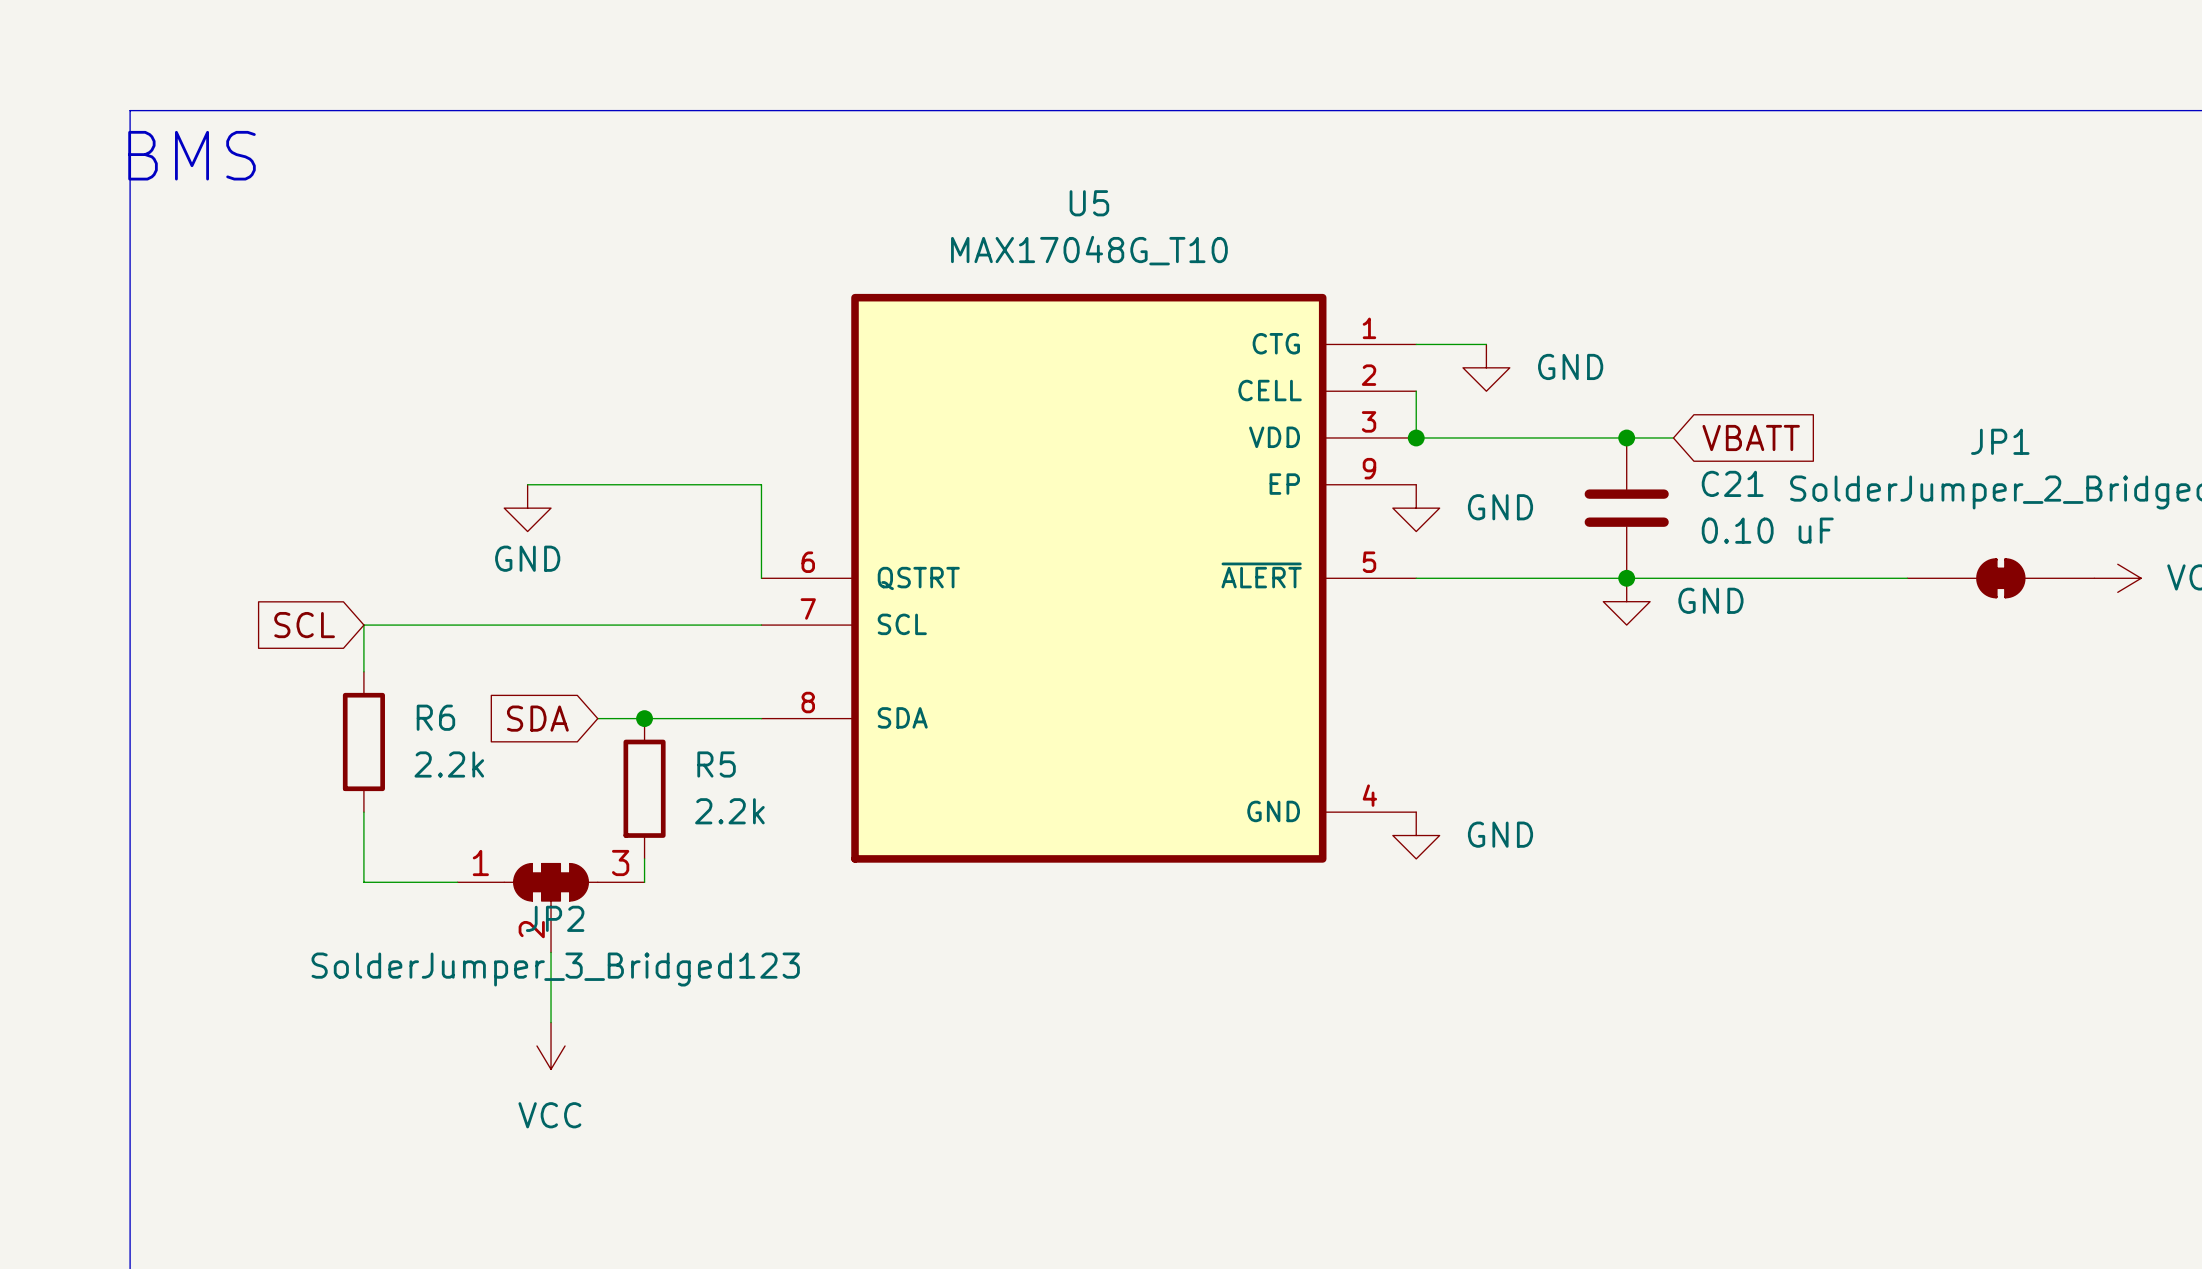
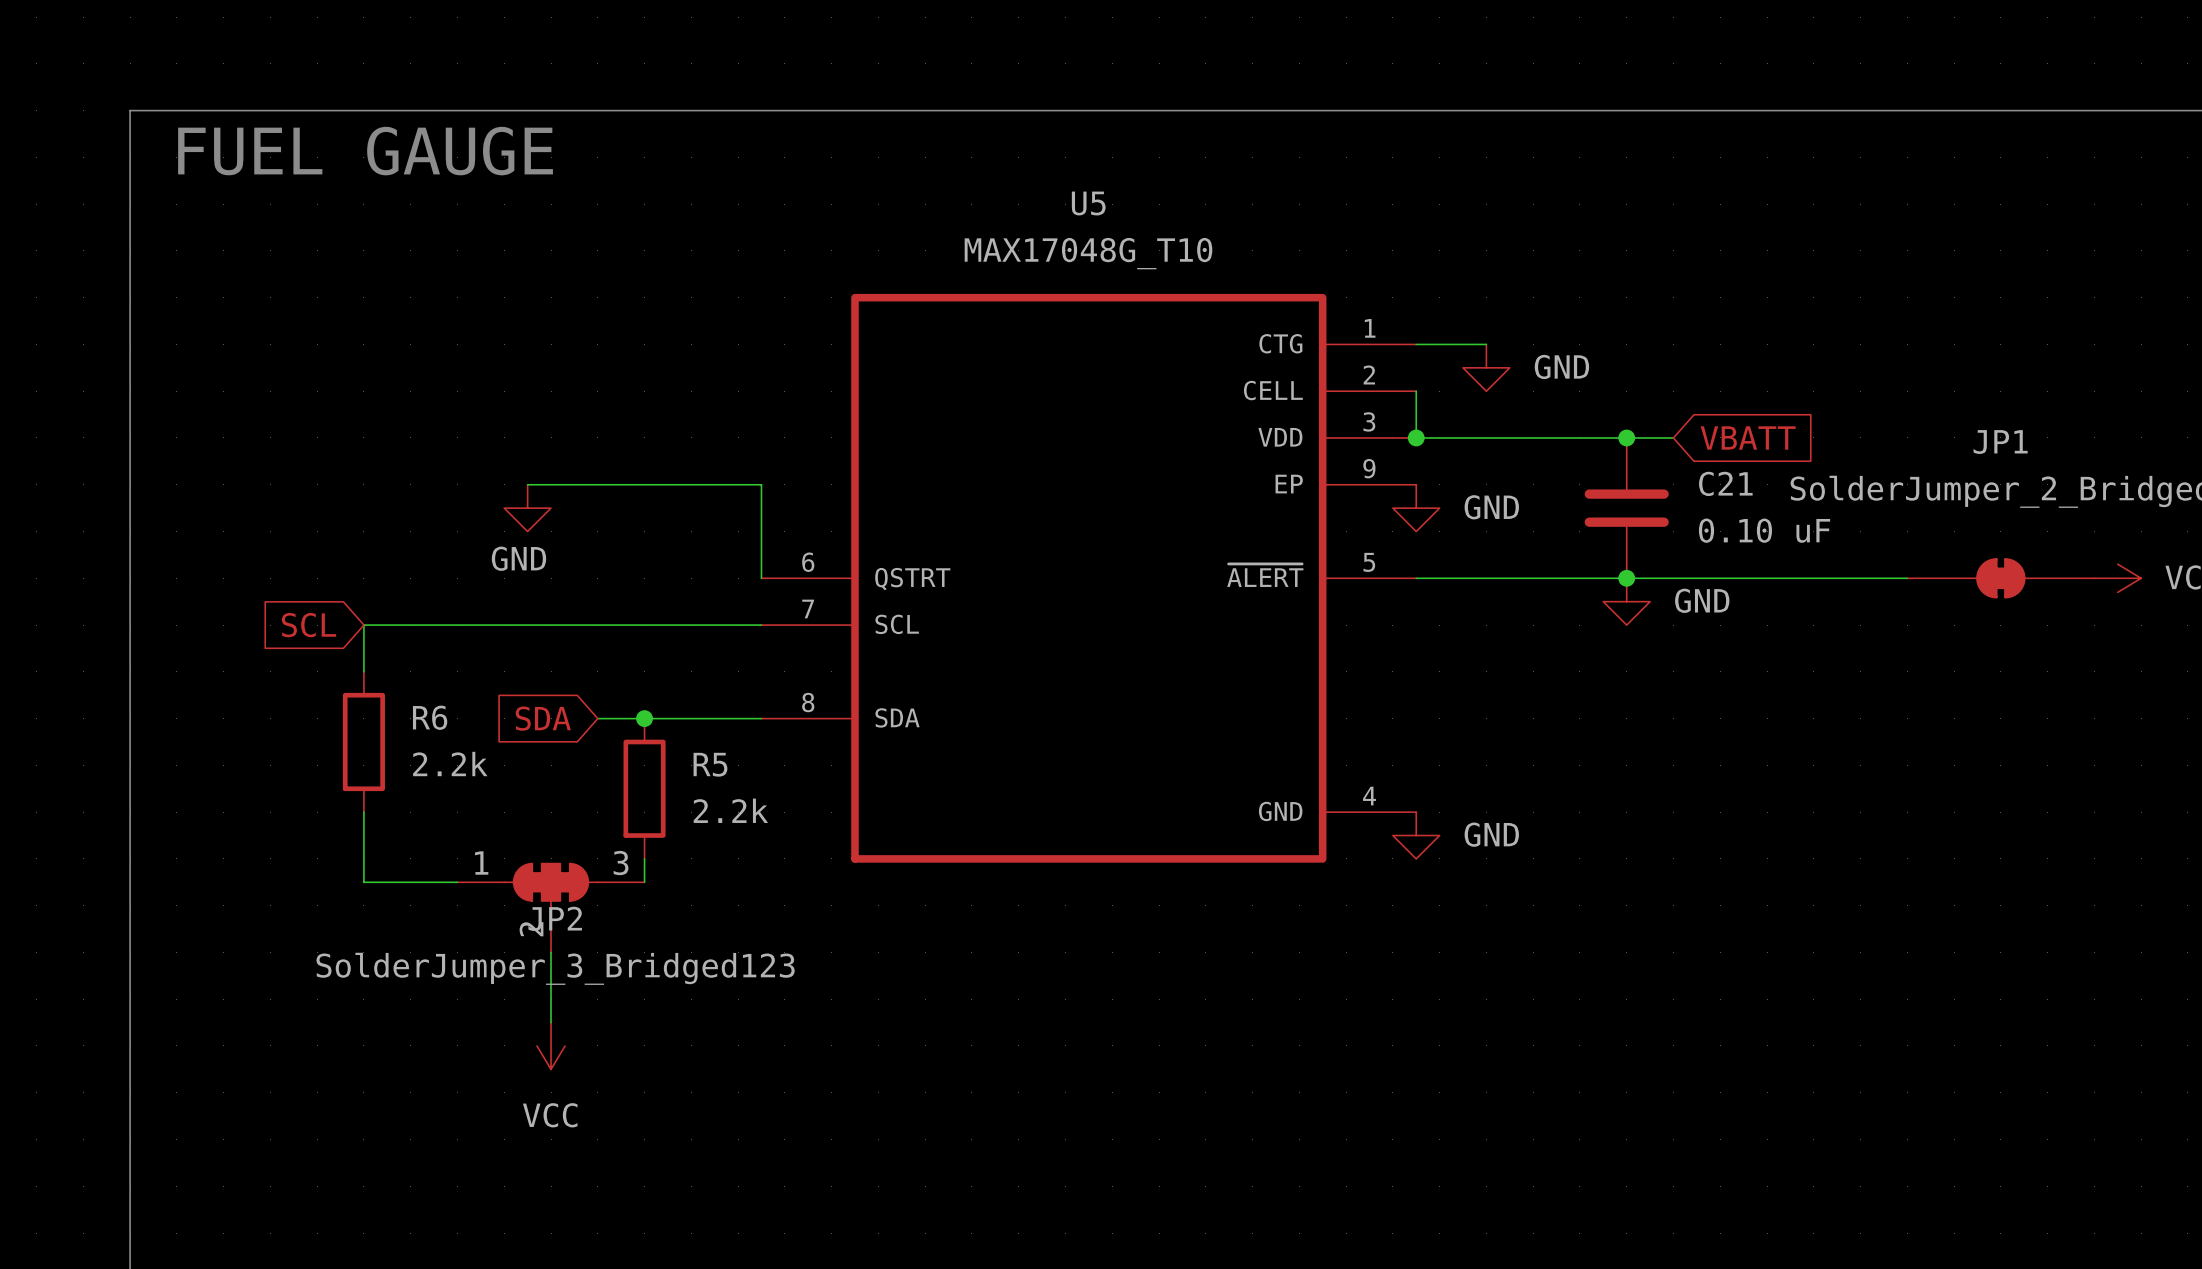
text: none -> FUEL GAUGE (365, 151)
text: BMS (192, 155) -> none

